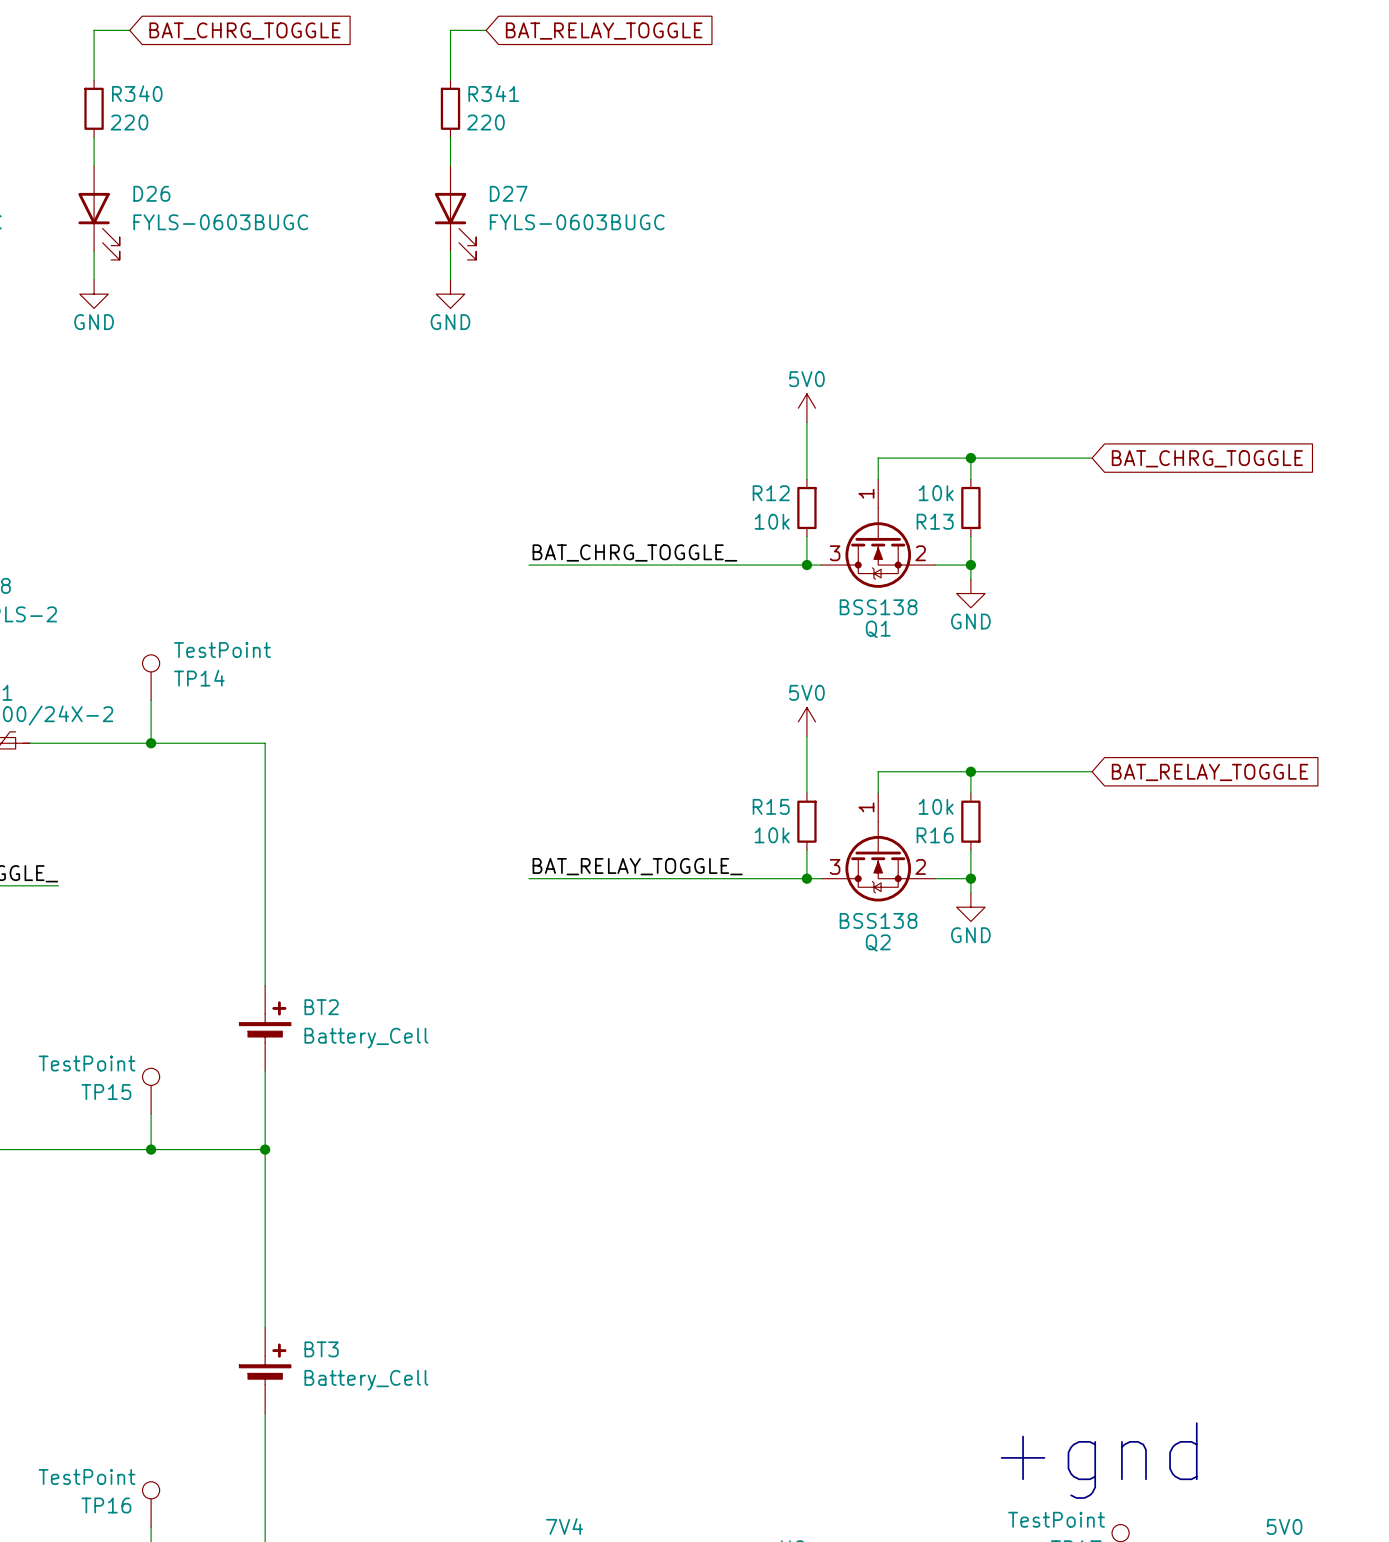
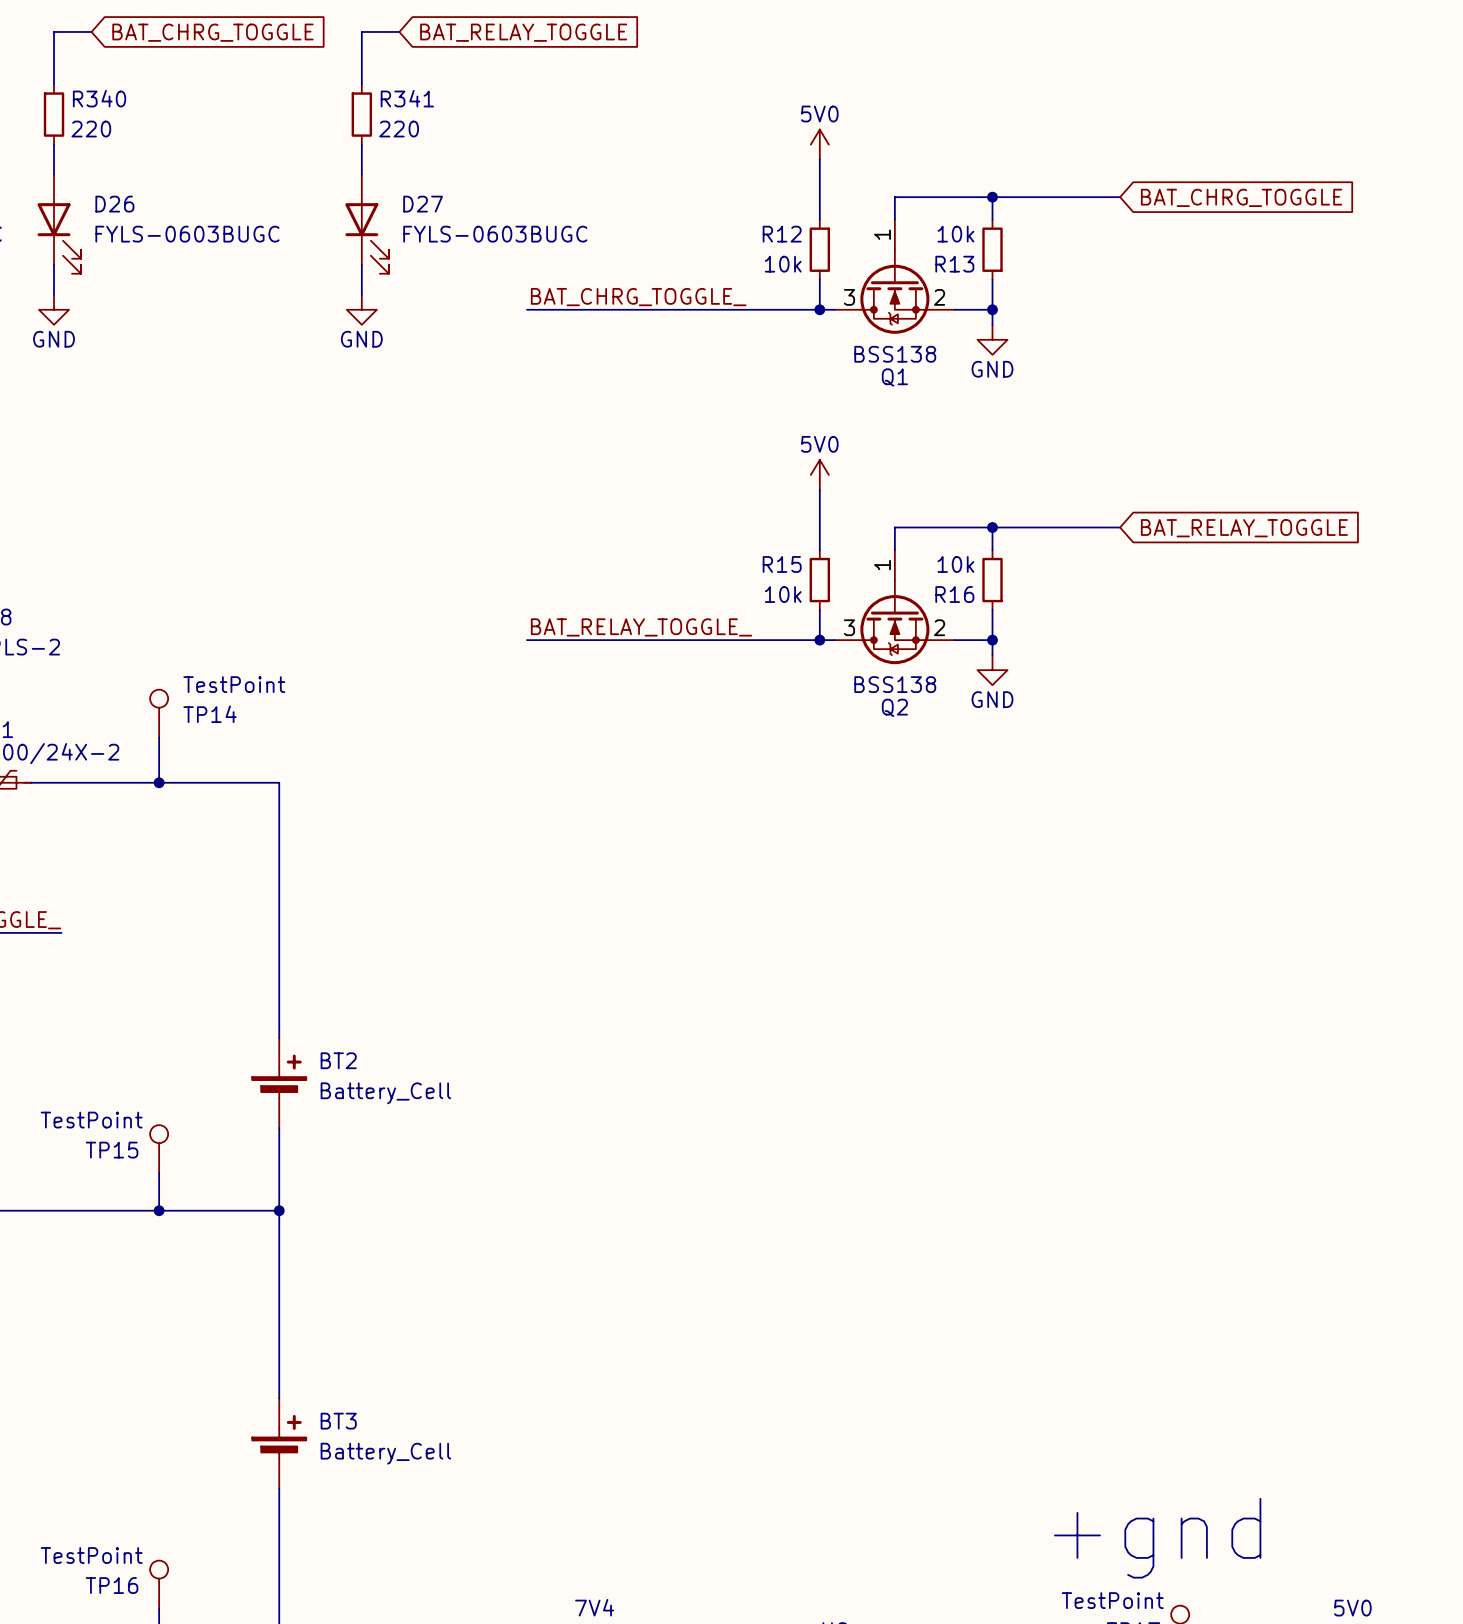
wire: (129, 30) (94, 30) (94, 80) -> (91, 31) (54, 31) (54, 84)
wire: (486, 30) (450, 30) (450, 80) -> (399, 31) (361, 31) (361, 84)
global label position: BAT_CHRG_TOGGLE (244, 31) -> BAT_CHRG_TOGGLE (212, 32)
global label position: BAT_RELAY_TOGGLE (604, 31) -> BAT_RELAY_TOGGLE (523, 32)
R340 position: (94, 108) -> (54, 114)
R341 position: (450, 108) -> (361, 114)
wire: (94, 137) (94, 165) -> (54, 144) (54, 174)
wire: (450, 137) (450, 165) -> (361, 144) (361, 174)
power symbol: none -> 5V0 (819, 144)
junction: none -> (992, 197)
D26 position: (99, 212) -> (59, 224)
D27 position: (455, 212) -> (367, 224)
wire: (94, 251) (94, 279) -> (54, 264) (54, 294)
wire: (450, 251) (450, 279) -> (361, 264) (361, 294)
power symbol position: GND (94, 294) -> GND (54, 309)
power symbol position: GND (450, 294) -> GND (361, 309)
junction: none -> (819, 309)
junction: none -> (992, 309)
power symbol: none -> GND (992, 339)
power symbol position: 5V0 (806, 408) -> 5V0 (819, 474)
wire: (806, 422) (806, 479) -> (819, 159) (819, 219)
wire: (970, 458) (970, 479) -> (992, 197) (992, 219)
junction: (970, 458) -> none
wire: (1092, 458) (878, 458) (878, 479) -> (1120, 197) (894, 197) (894, 219)
global label position: BAT_CHRG_TOGGLE (1207, 458) -> BAT_CHRG_TOGGLE (1241, 197)
junction: none -> (992, 527)
R12 position: (806, 508) -> (819, 249)
R13 position: (970, 508) -> (992, 249)
Q1 position: (878, 533) -> (894, 276)
wire: (806, 536) (806, 565) -> (819, 279) (819, 309)
wire: (970, 536) (970, 579) -> (992, 279) (992, 324)
label position: BAT_CHRG_TOGGLE_ (634, 552) -> BAT_CHRG_TOGGLE_ (638, 297)
wire: (528, 565) (821, 565) -> (527, 309) (834, 309)
junction position: (806, 565) -> (819, 640)
wire: (935, 565) (970, 565) -> (954, 309) (992, 309)
junction: (970, 565) -> none
power symbol position: GND (970, 593) -> GND (992, 670)
junction: none -> (992, 640)
power symbol: 5V0 (806, 721) -> none
wire: (806, 736) (806, 793) -> (819, 489) (819, 550)
wire: (970, 771) (970, 793) -> (992, 527) (992, 550)
junction: (970, 771) -> none
wire: (1092, 771) (878, 771) (878, 793) -> (1120, 527) (894, 527) (894, 550)
global label position: BAT_RELAY_TOGGLE (1210, 772) -> BAT_RELAY_TOGGLE (1244, 528)
R15 position: (806, 821) -> (819, 580)
R16 position: (970, 821) -> (992, 580)
Q2 position: (878, 847) -> (894, 607)
wire: (806, 850) (806, 878) -> (819, 610) (819, 640)
wire: (970, 850) (970, 892) -> (992, 610) (992, 655)
label position: BAT_RELAY_TOGGLE_ (637, 866) -> BAT_RELAY_TOGGLE_ (641, 627)
wire: (528, 878) (821, 878) -> (527, 640) (834, 640)
junction: (806, 878) -> none
wire: (935, 878) (970, 878) -> (954, 640) (992, 640)
junction: (970, 878) -> none
power symbol: GND (970, 907) -> none

